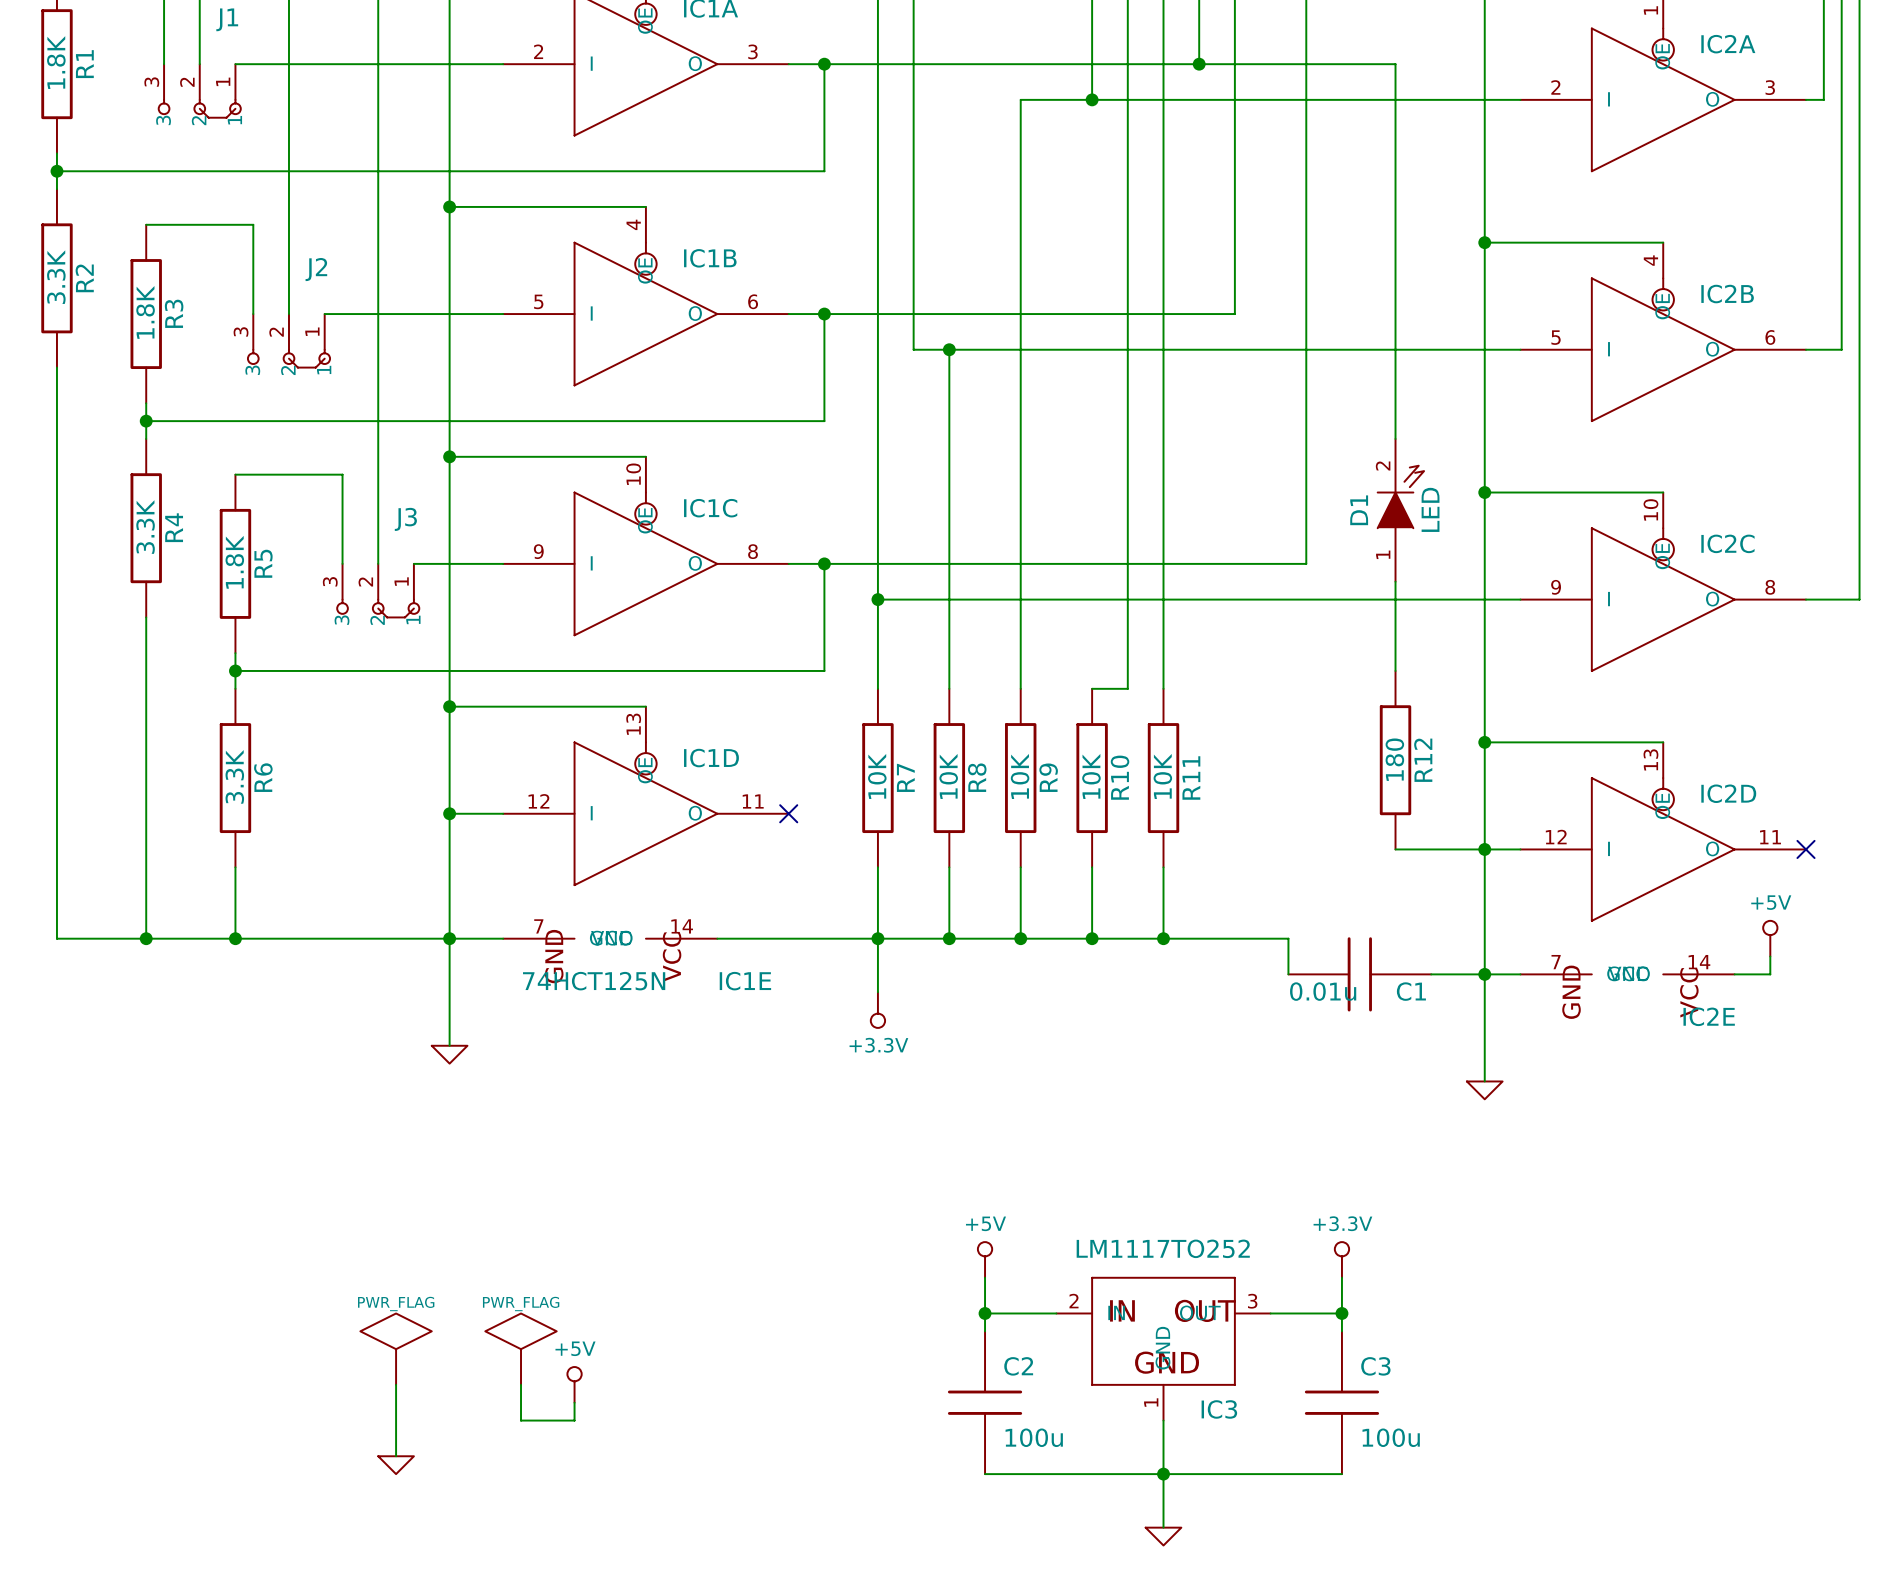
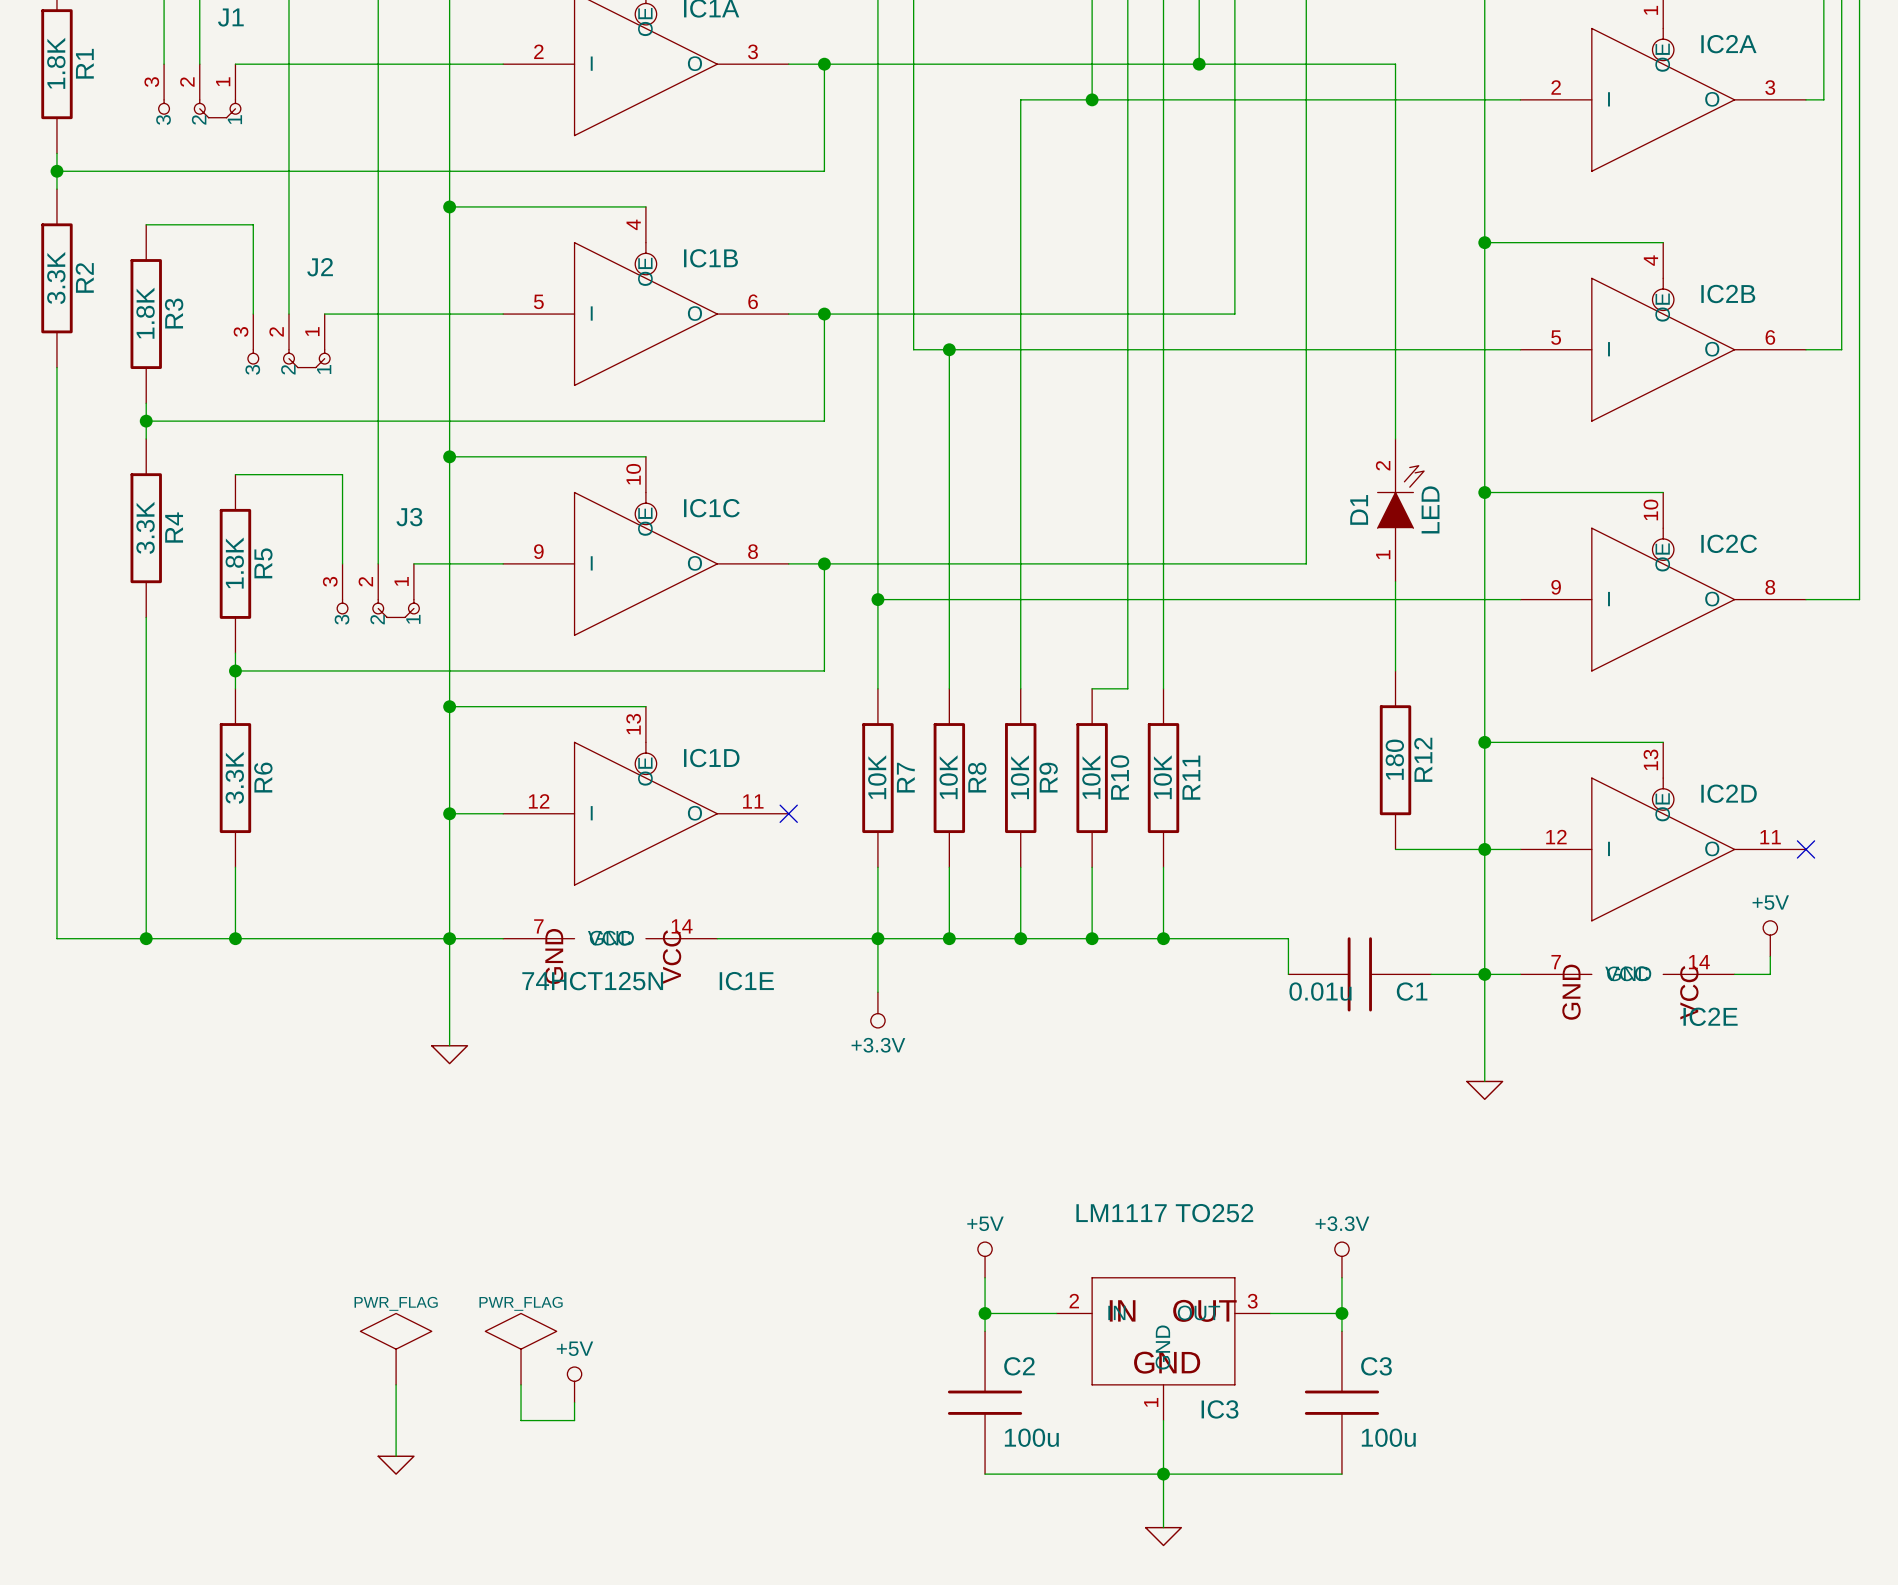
IC3 value: LM1117TO252 (1163, 1248) -> LM1117 TO252 (1164, 1213)

